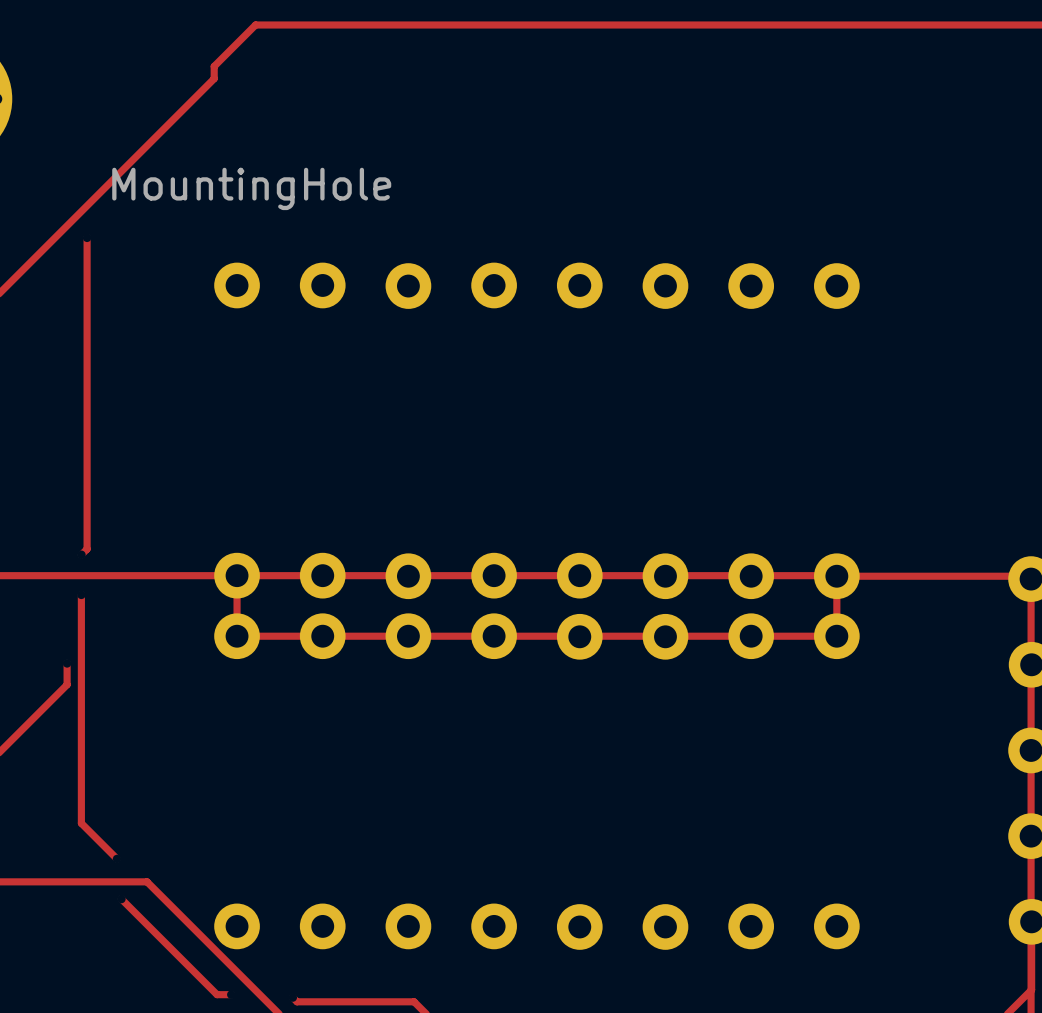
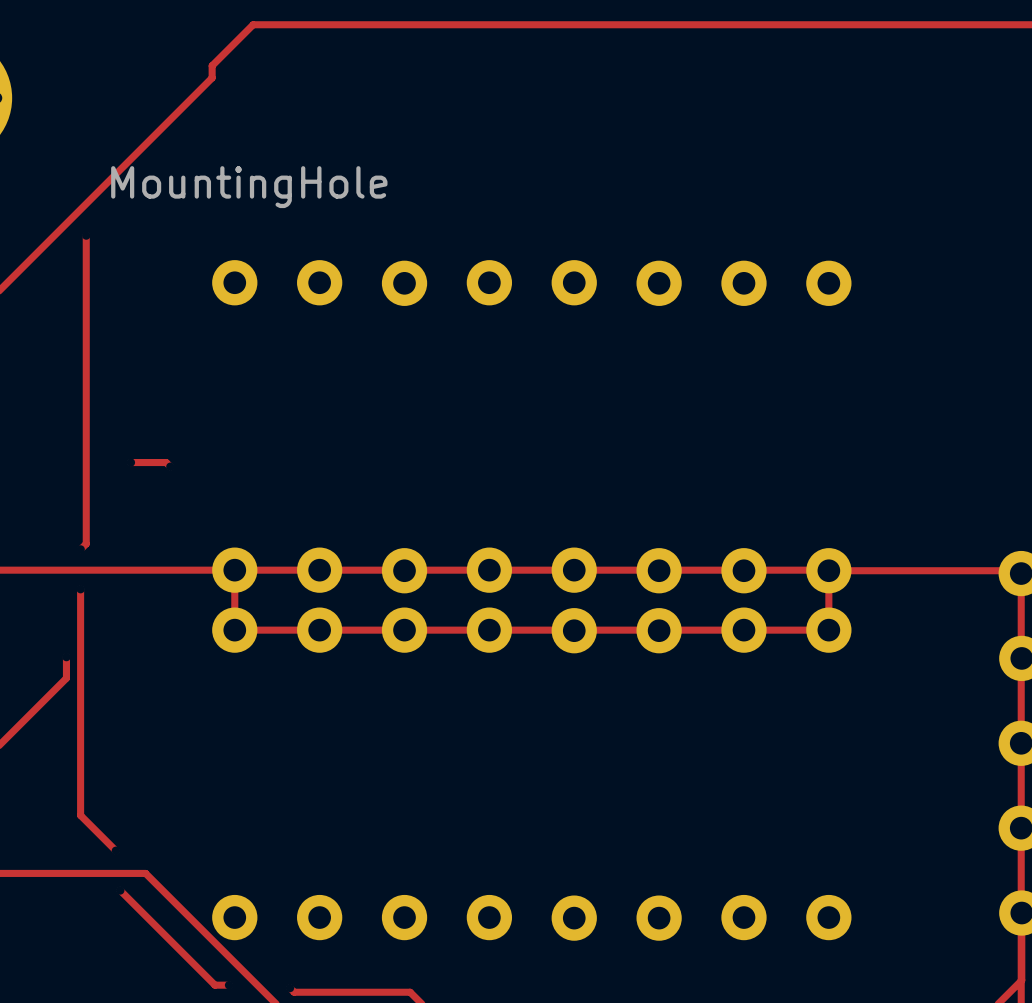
track: none -> (130, 462) (166, 462) (170, 466)
via: none -> (130, 462)
via: none -> (170, 466)

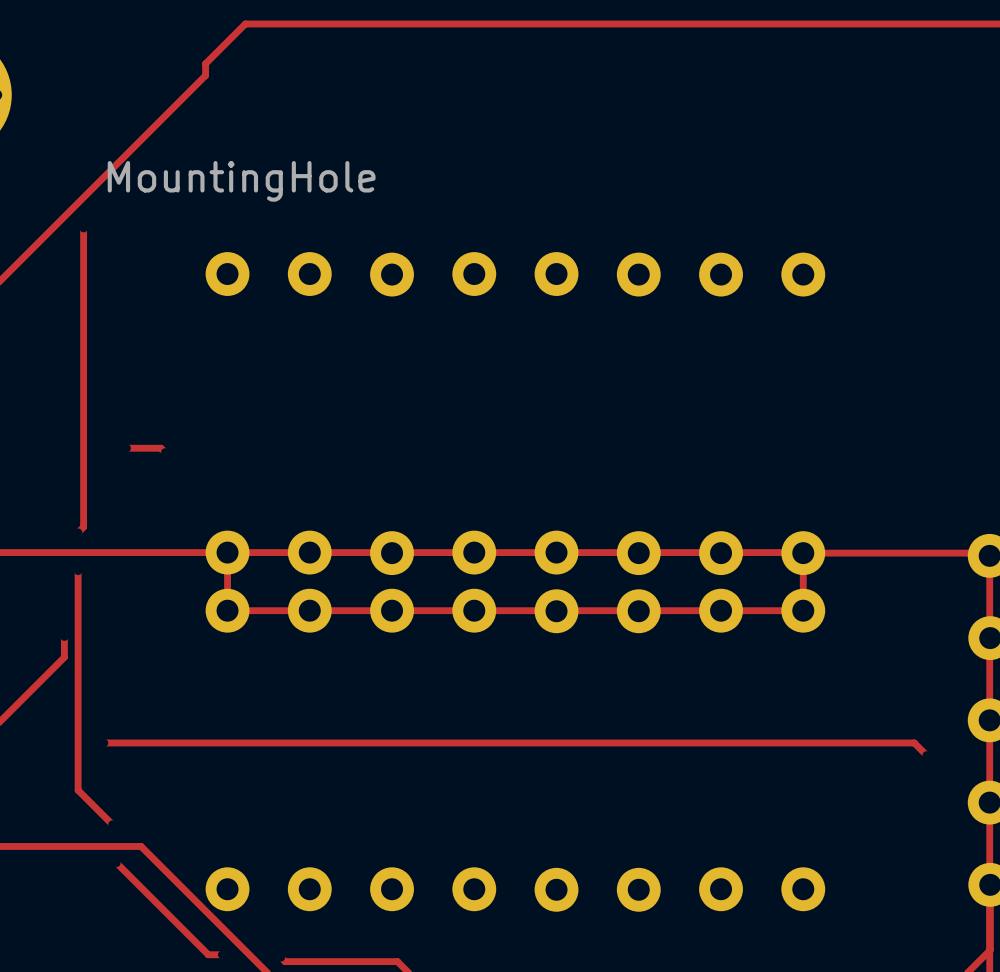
track: none -> (104, 742) (914, 742) (926, 755)
via: none -> (104, 742)
via: none -> (926, 755)

